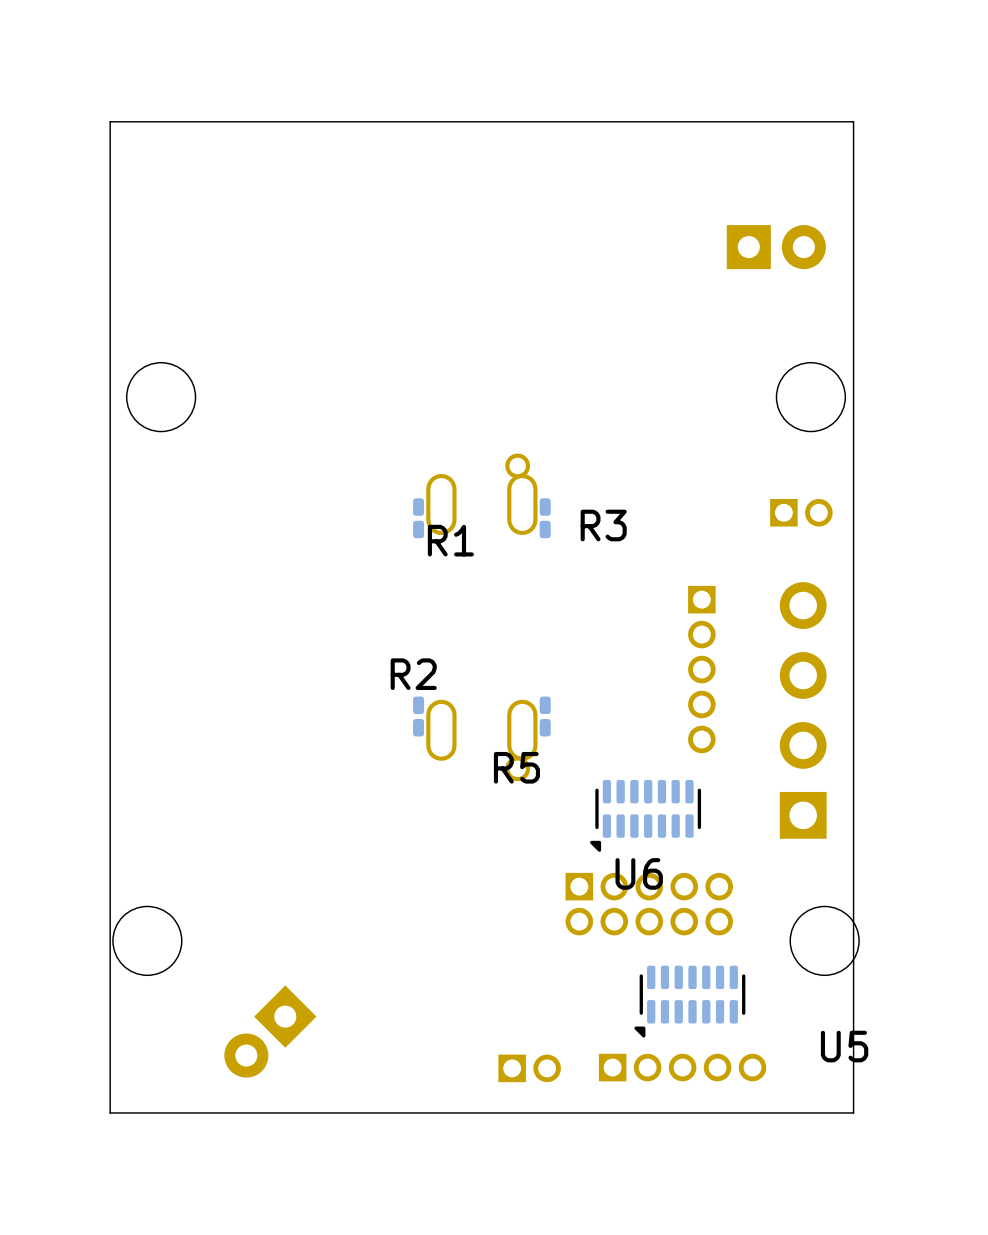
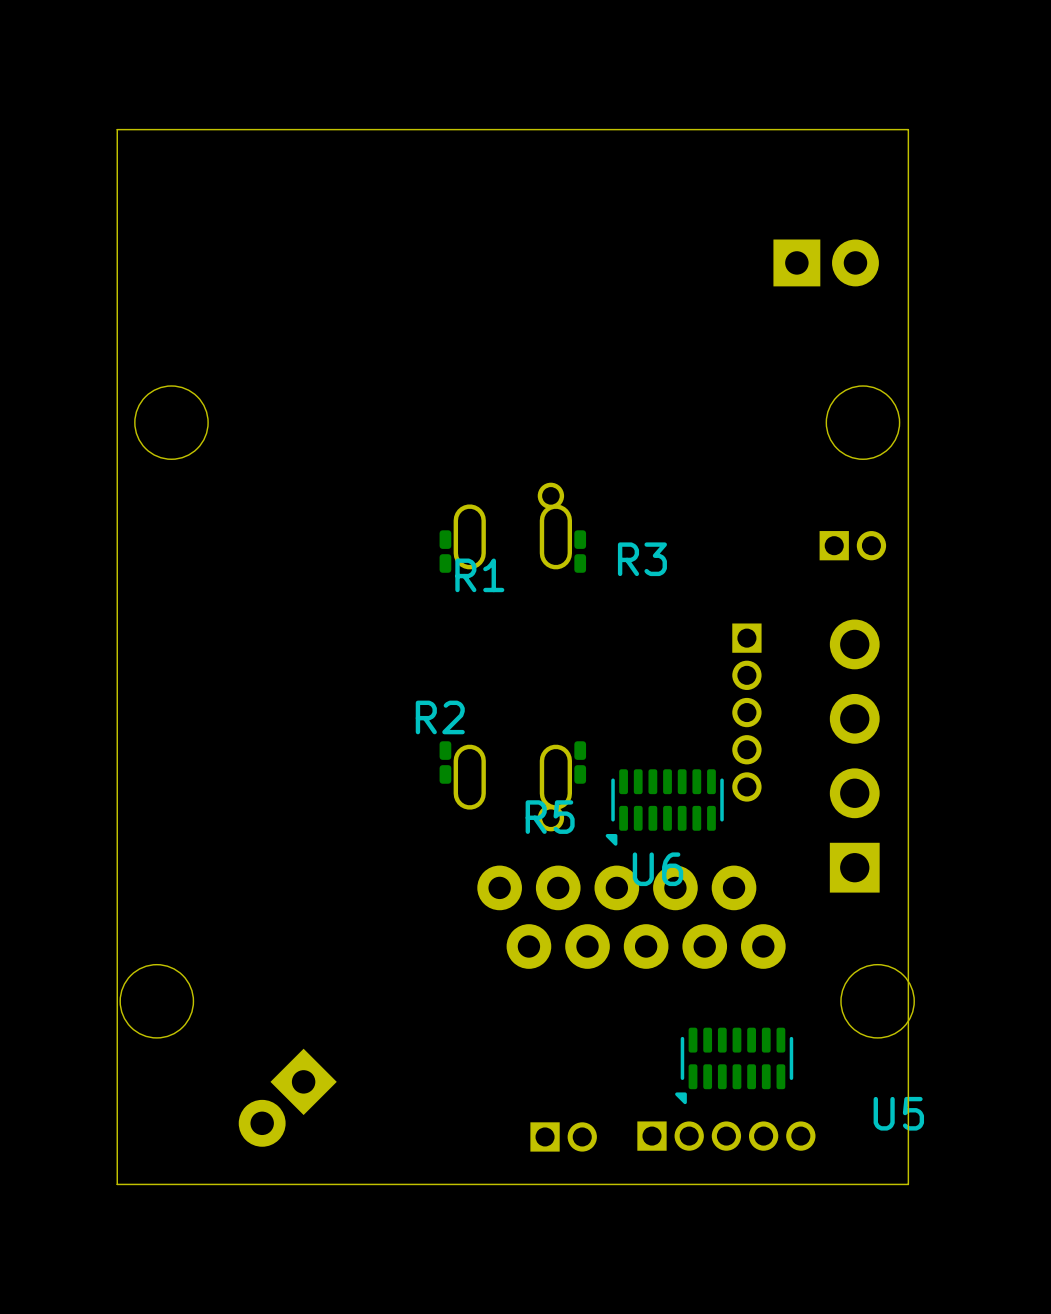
U6 position: (645, 815) -> (664, 807)
part: none -> (631, 917)
part: (649, 904) -> none

